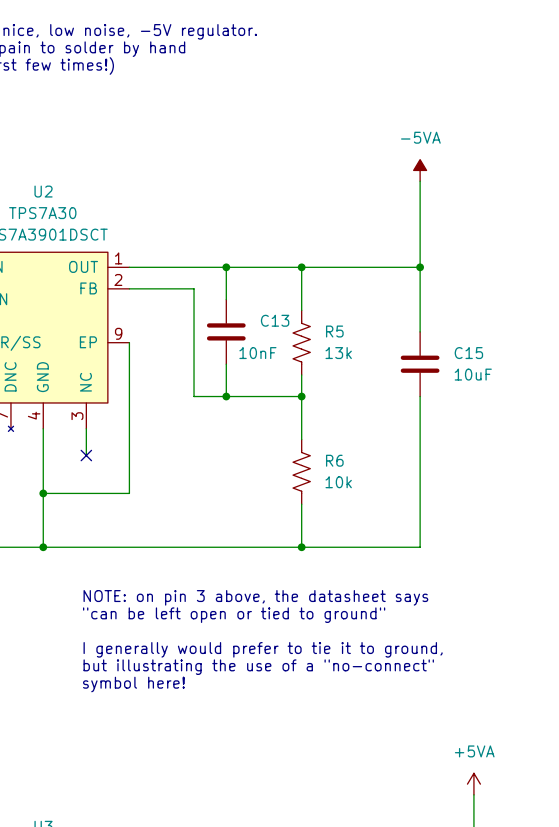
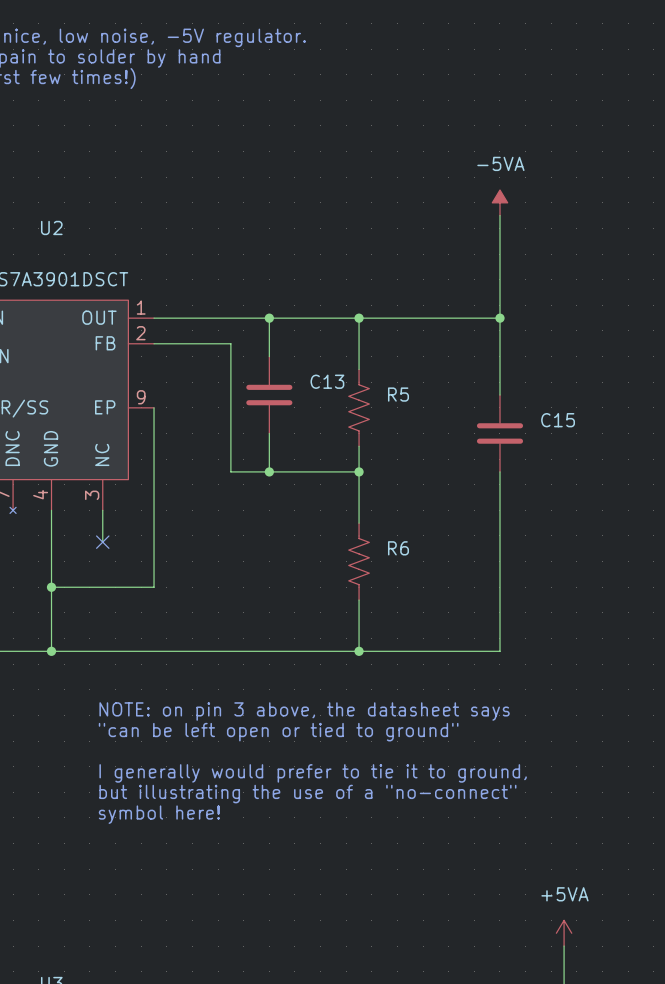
U2 value: TPS7A30 (42, 213) -> none
C13 value: 10nF (257, 353) -> none
R5 value: 13k (338, 353) -> none
C15 value: 10uF (473, 374) -> none
R6 value: 10k (338, 482) -> none

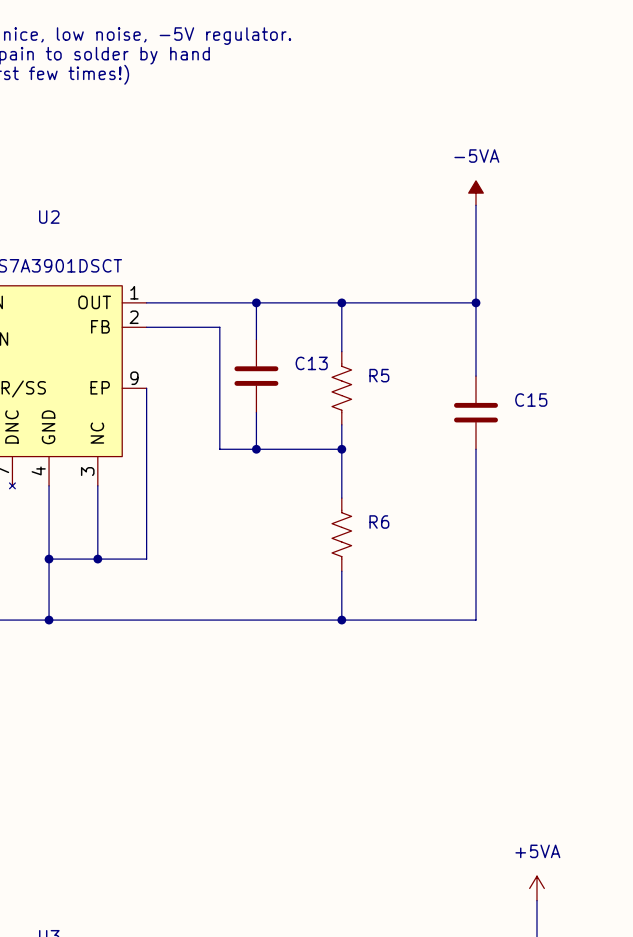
wire: none -> (97, 516) (97, 559)
no-connect mark: (102, 542) -> none
junction: none -> (97, 559)
text: NOTE: on pin 3 above, the datasheet says (304, 711) -> none
text: "can be left open or tied to ground" (278, 732) -> none
text: I generally would prefer to tie it to ground, (313, 773) -> none
text: but illustrating the use of a "no-connect" (307, 794) -> none
text: symbol here! (159, 814) -> none

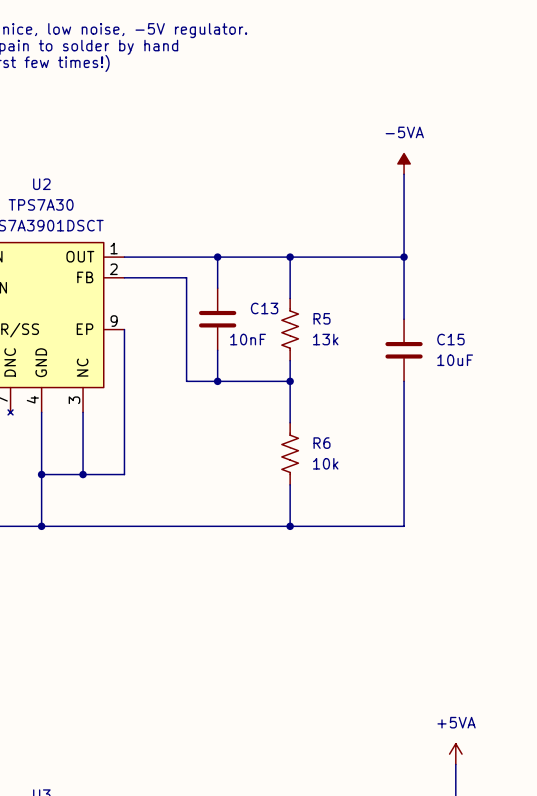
U2 value: none -> TPS7A30 (41, 204)
C13 value: none -> 10nF (248, 339)
R5 value: none -> 13k (325, 339)
C15 value: none -> 10uF (455, 360)
R6 value: none -> 10k (325, 463)

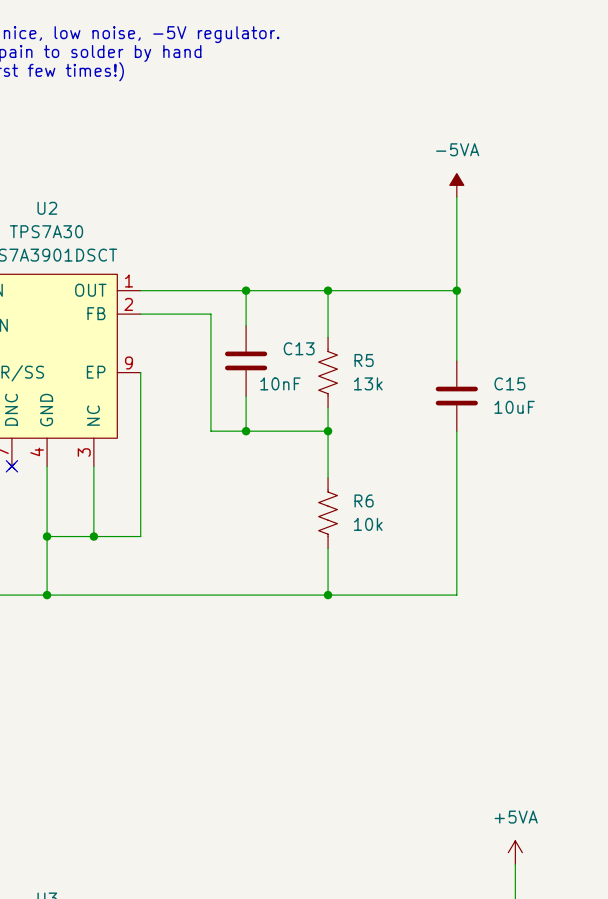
no-connect mark: none -> (11, 466)

